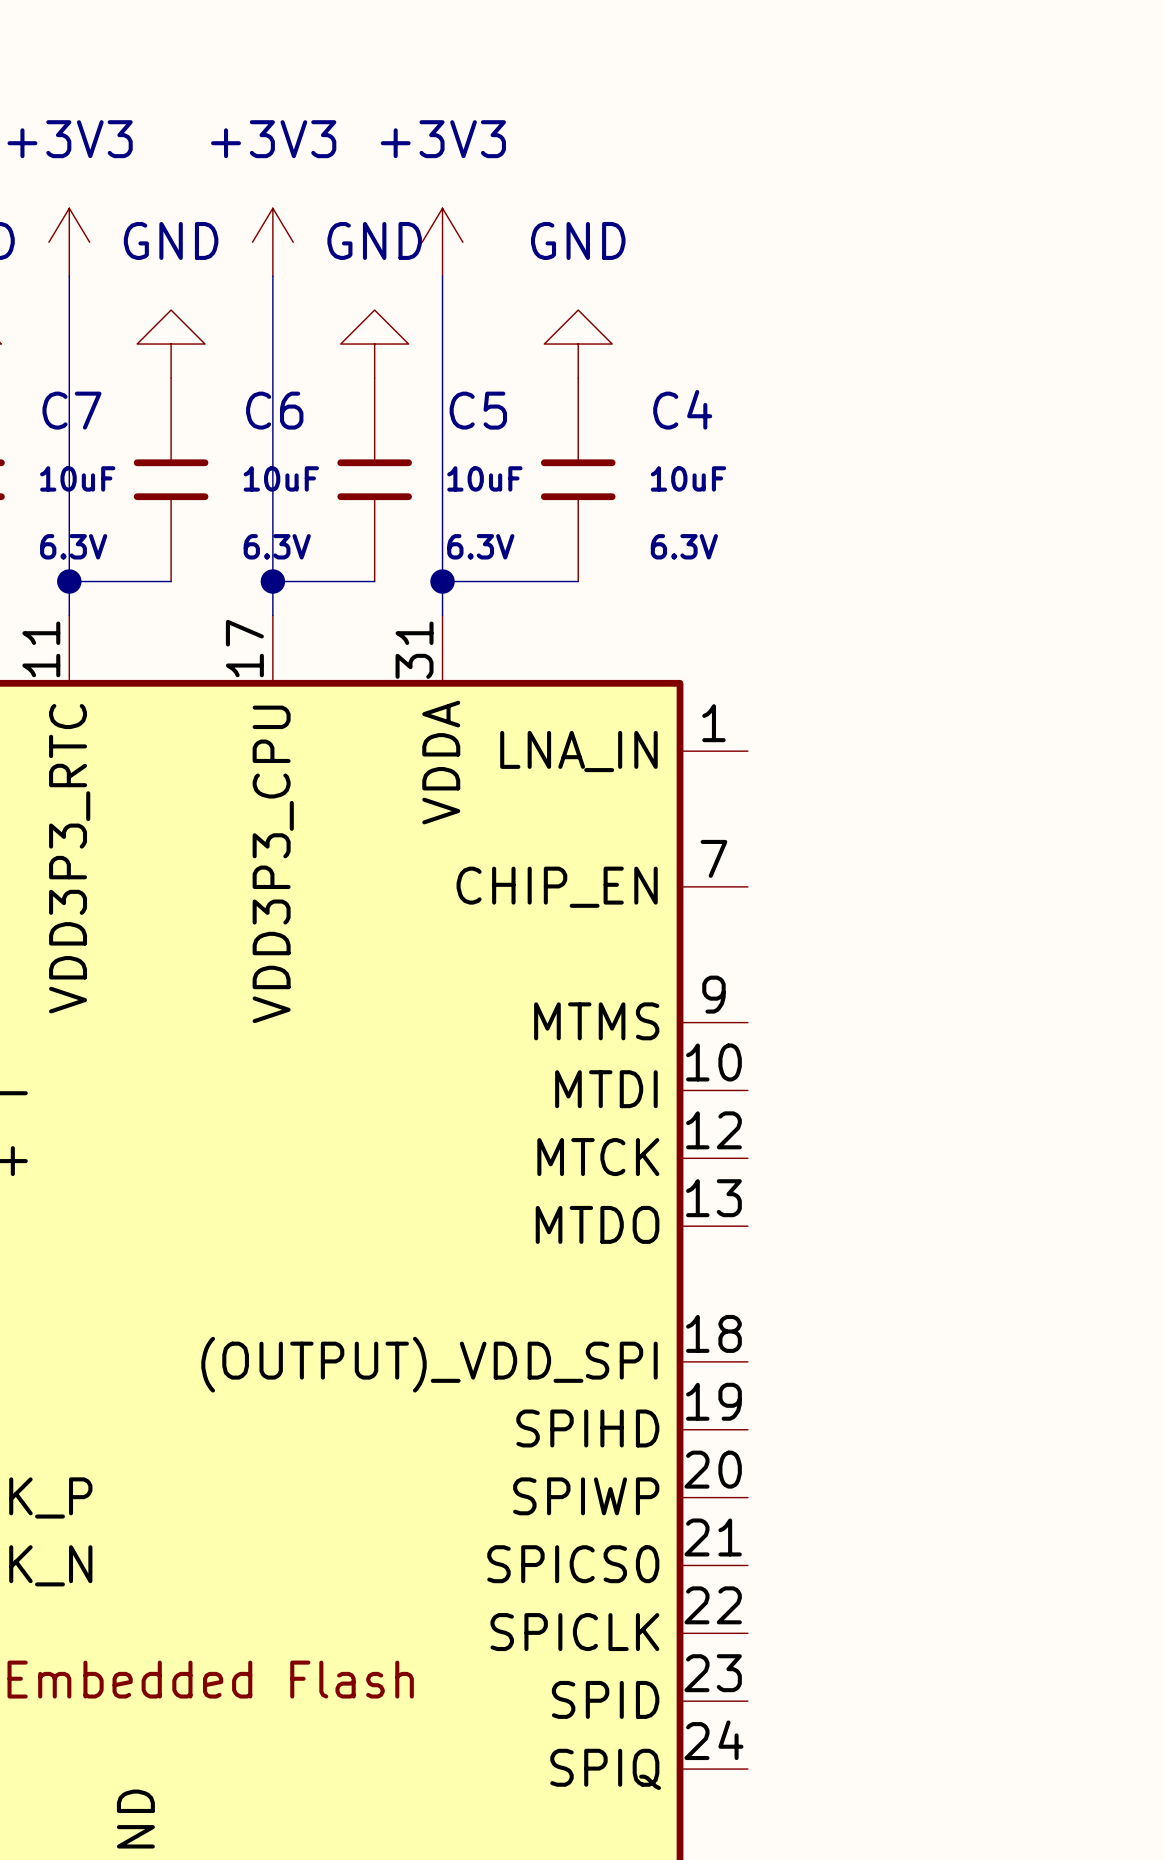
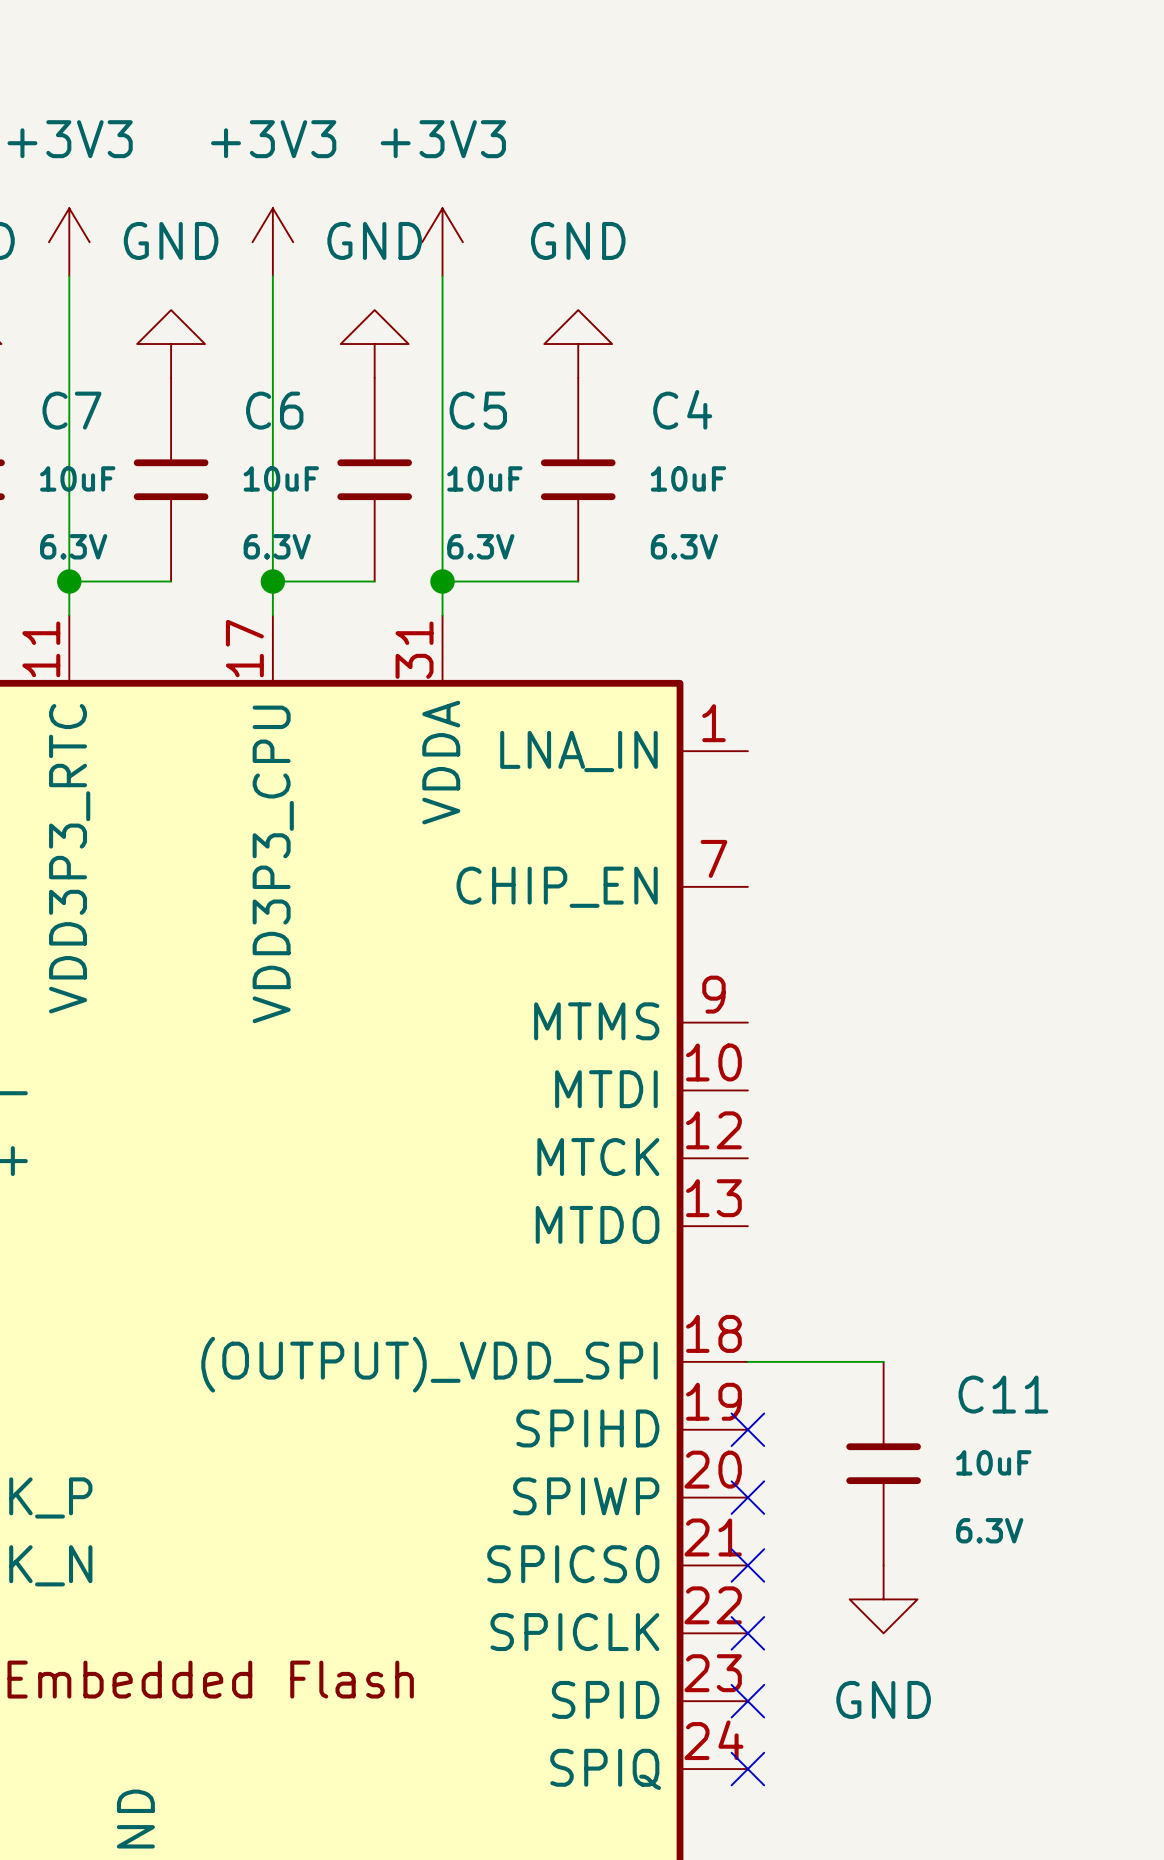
wire: none -> (747, 1361) (883, 1361)
no-connect mark: none -> (747, 1429)
C11: none -> 10uF (883, 1463)
no-connect mark: none -> (747, 1497)
no-connect mark: none -> (747, 1565)
power symbol: none -> GND (883, 1599)
no-connect mark: none -> (747, 1633)
no-connect mark: none -> (747, 1701)
no-connect mark: none -> (747, 1769)

